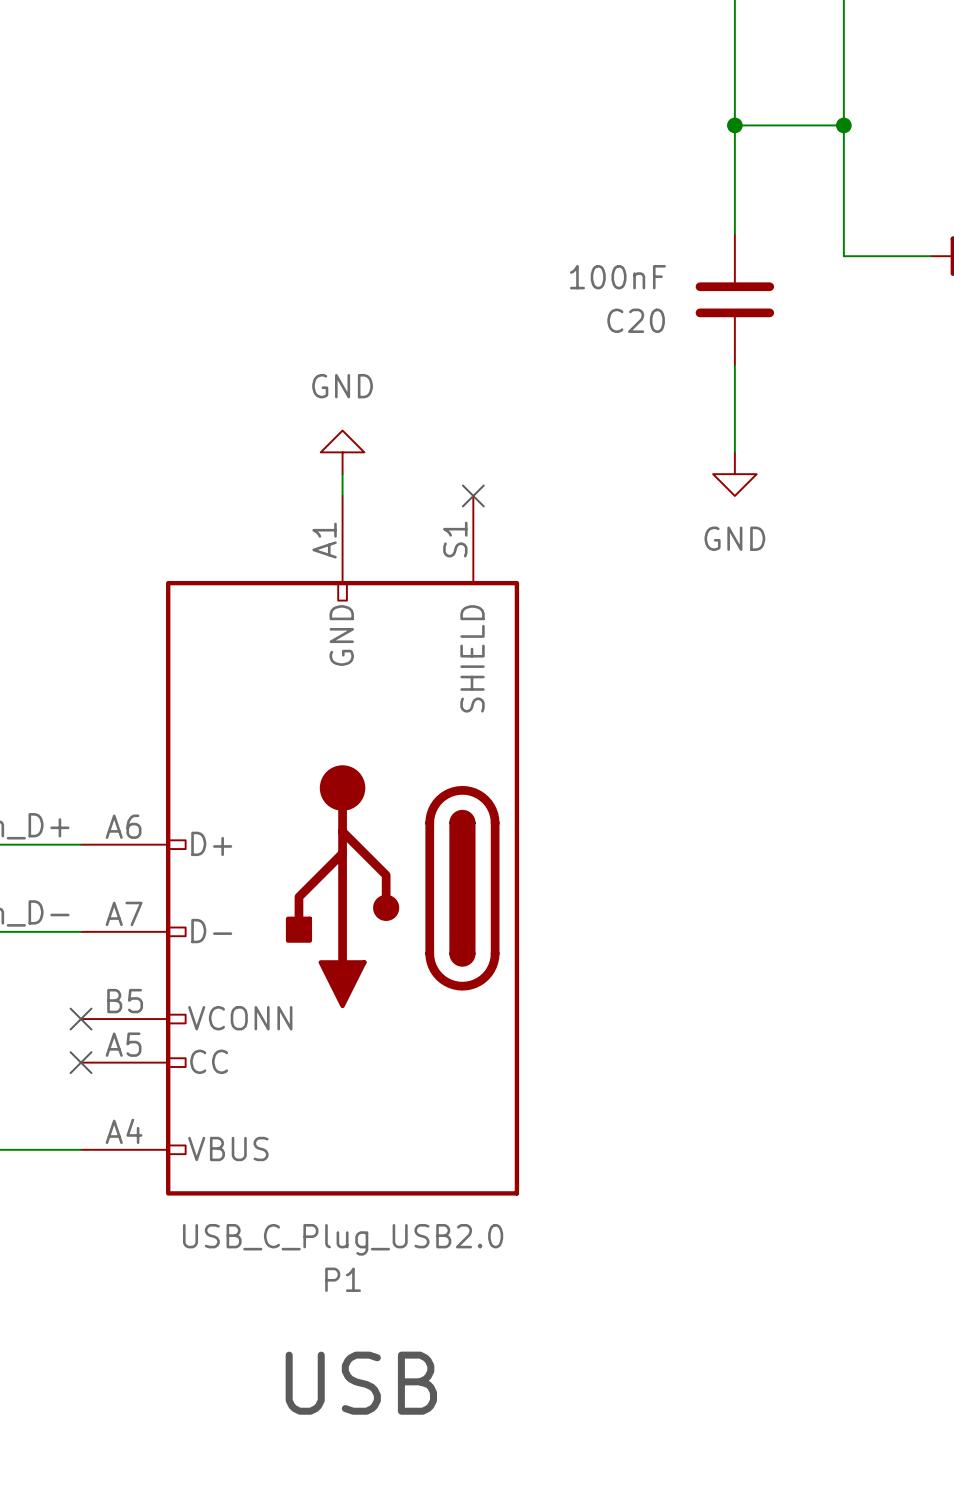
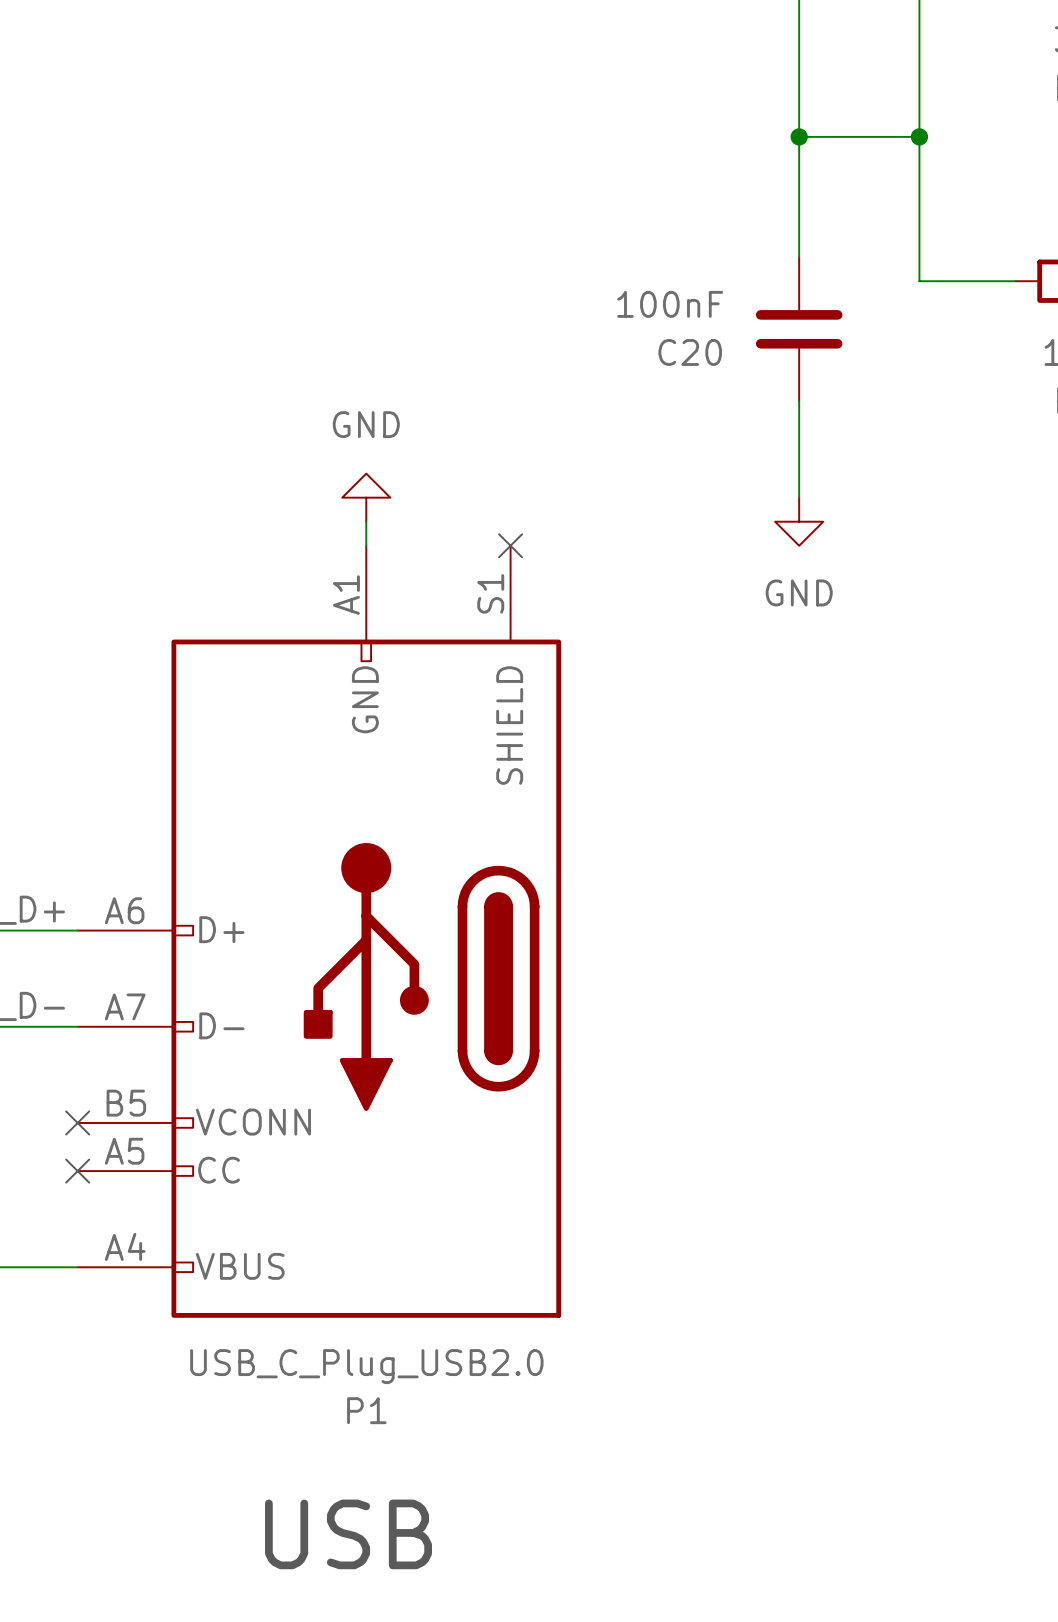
text position: USB (361, 1383) -> USB (348, 1534)

